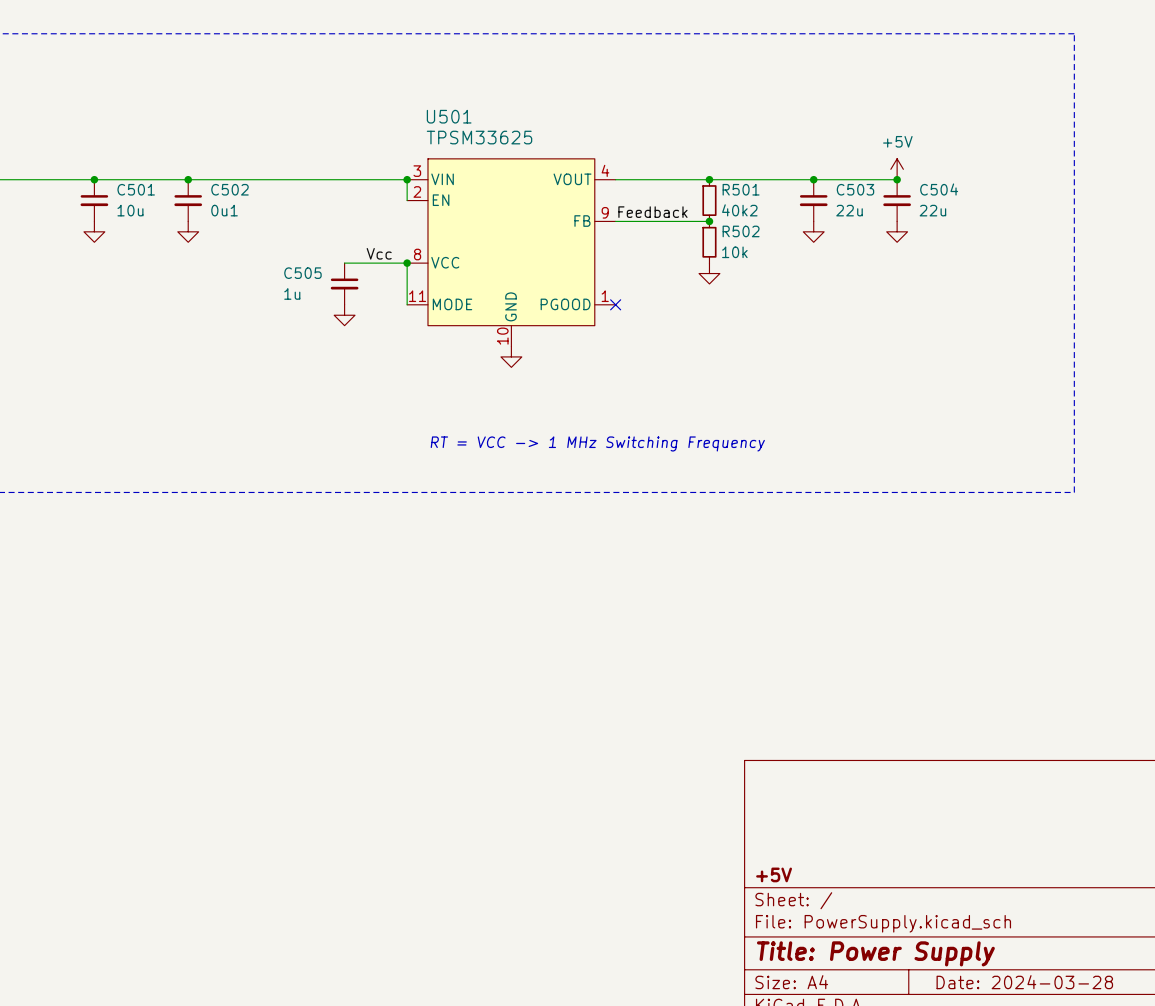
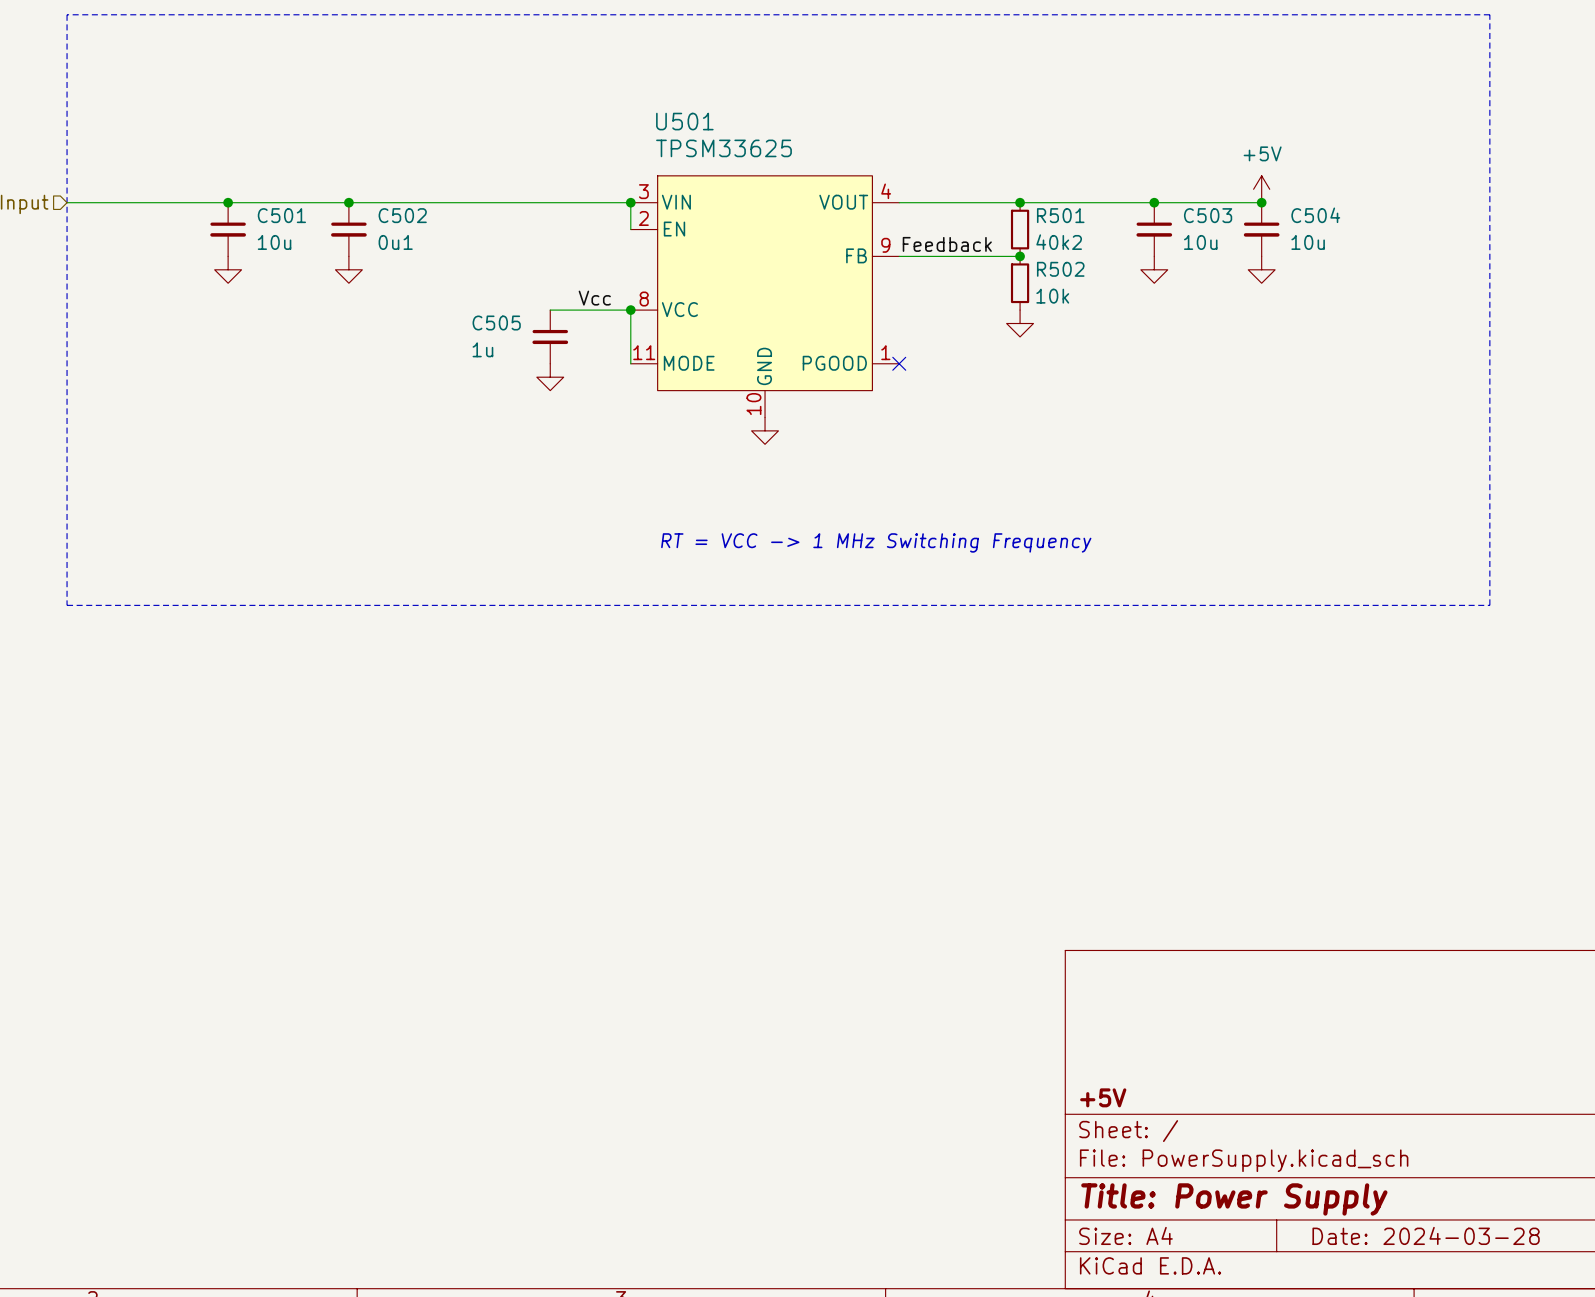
C503 value: 22u (849, 210) -> 10u (1200, 242)
C504 value: 22u (932, 210) -> 10u (1308, 242)

